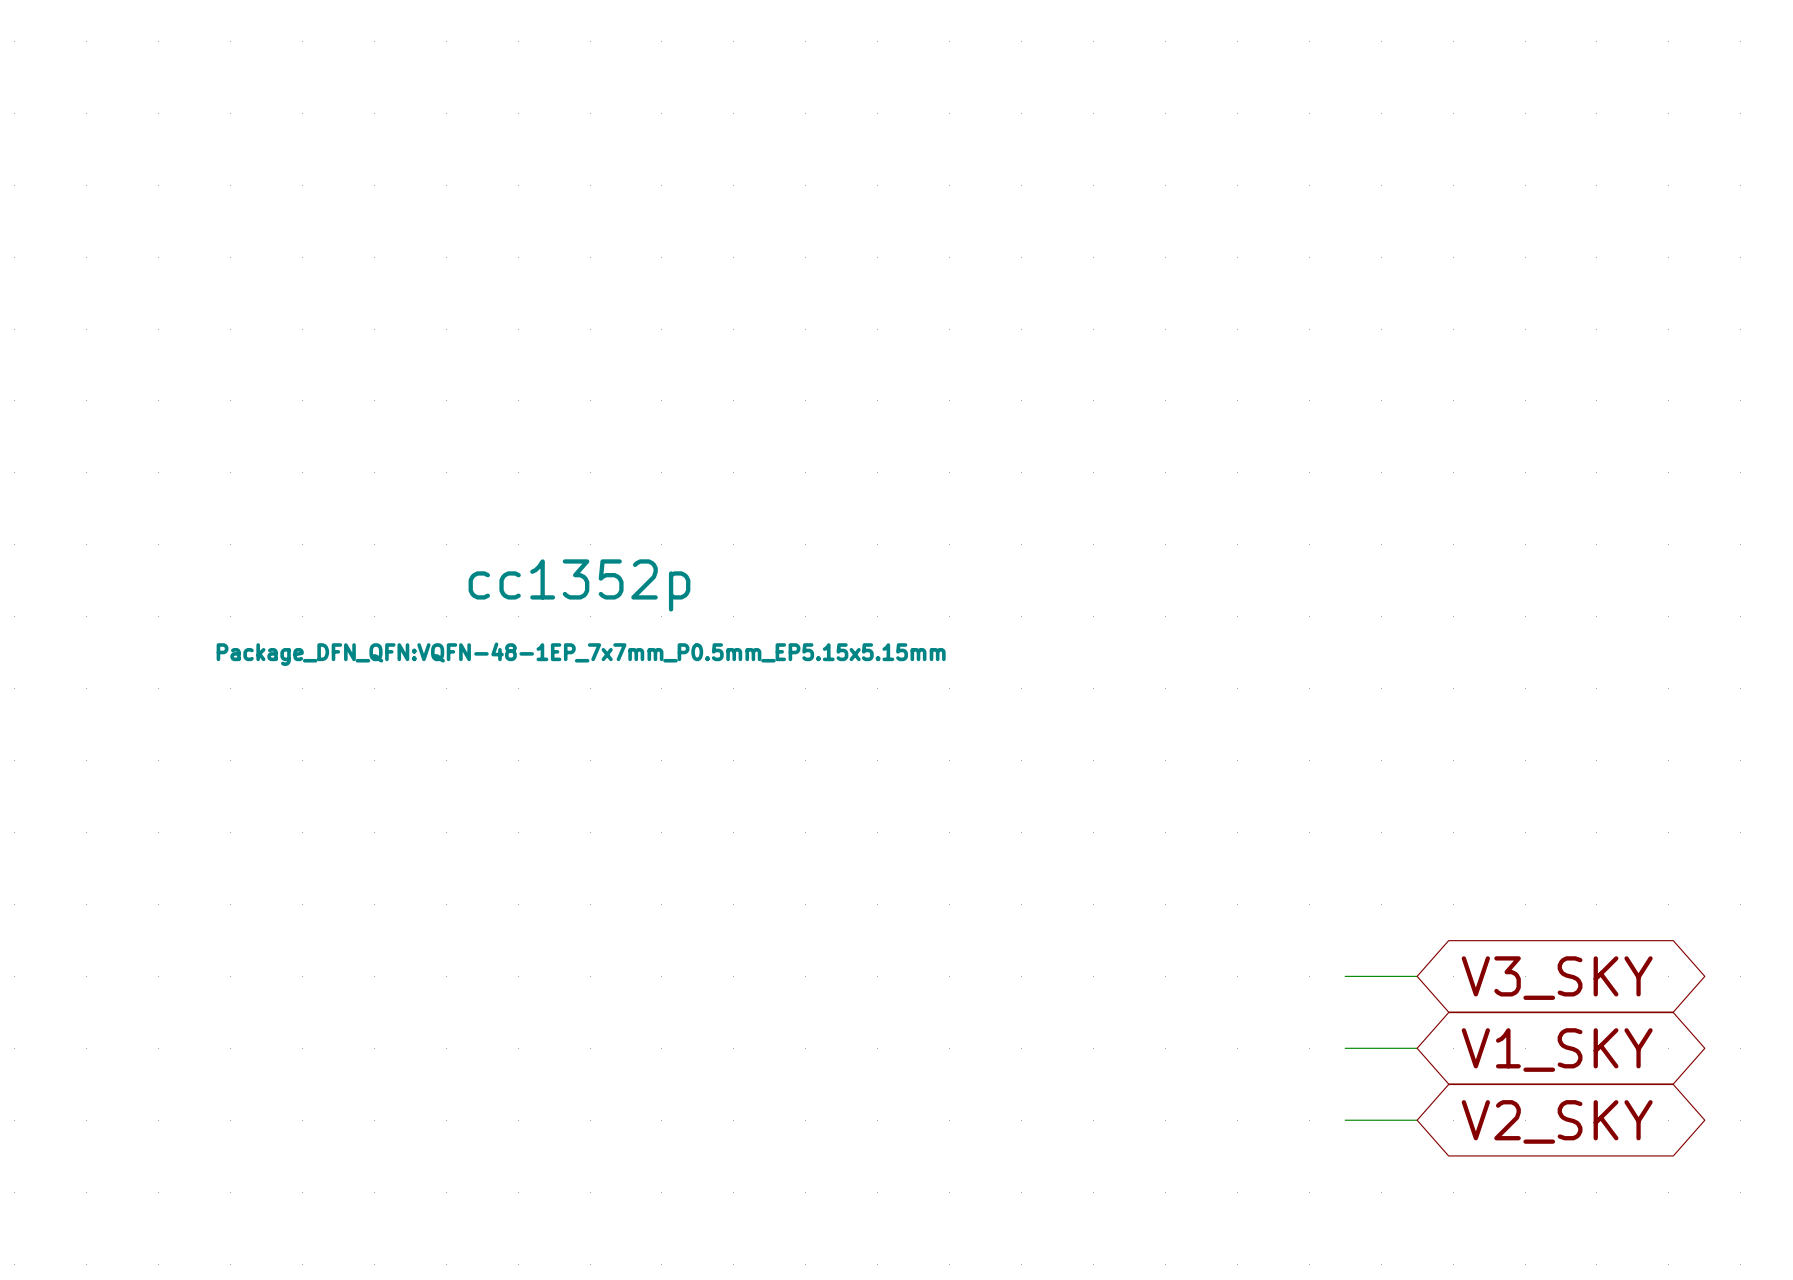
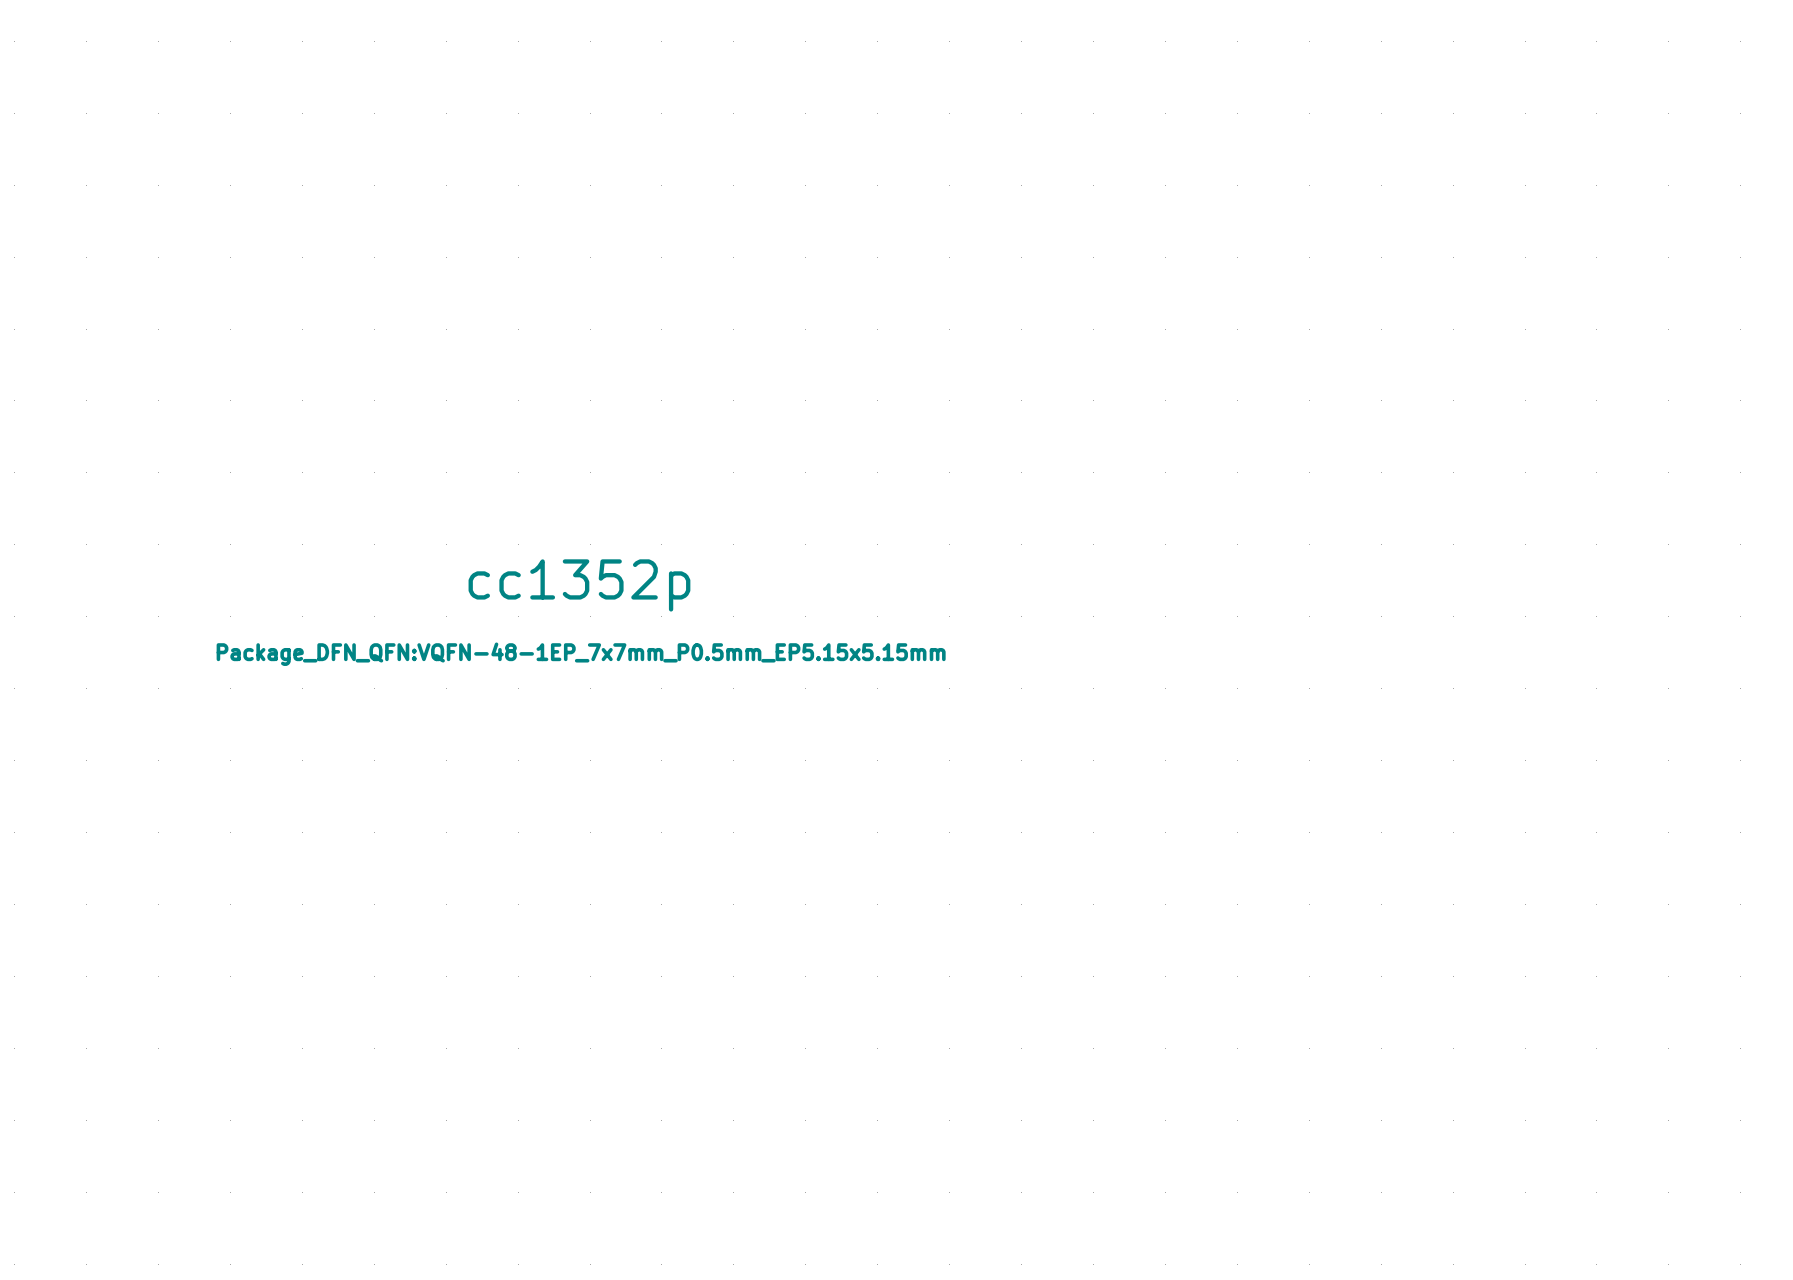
wire: (1345, 976) (1417, 976) -> none
global label: V3_SKY (1557, 978) -> none
wire: (1345, 1048) (1417, 1048) -> none
global label: V1_SKY (1557, 1050) -> none
wire: (1345, 1120) (1417, 1120) -> none
global label: V2_SKY (1557, 1121) -> none

